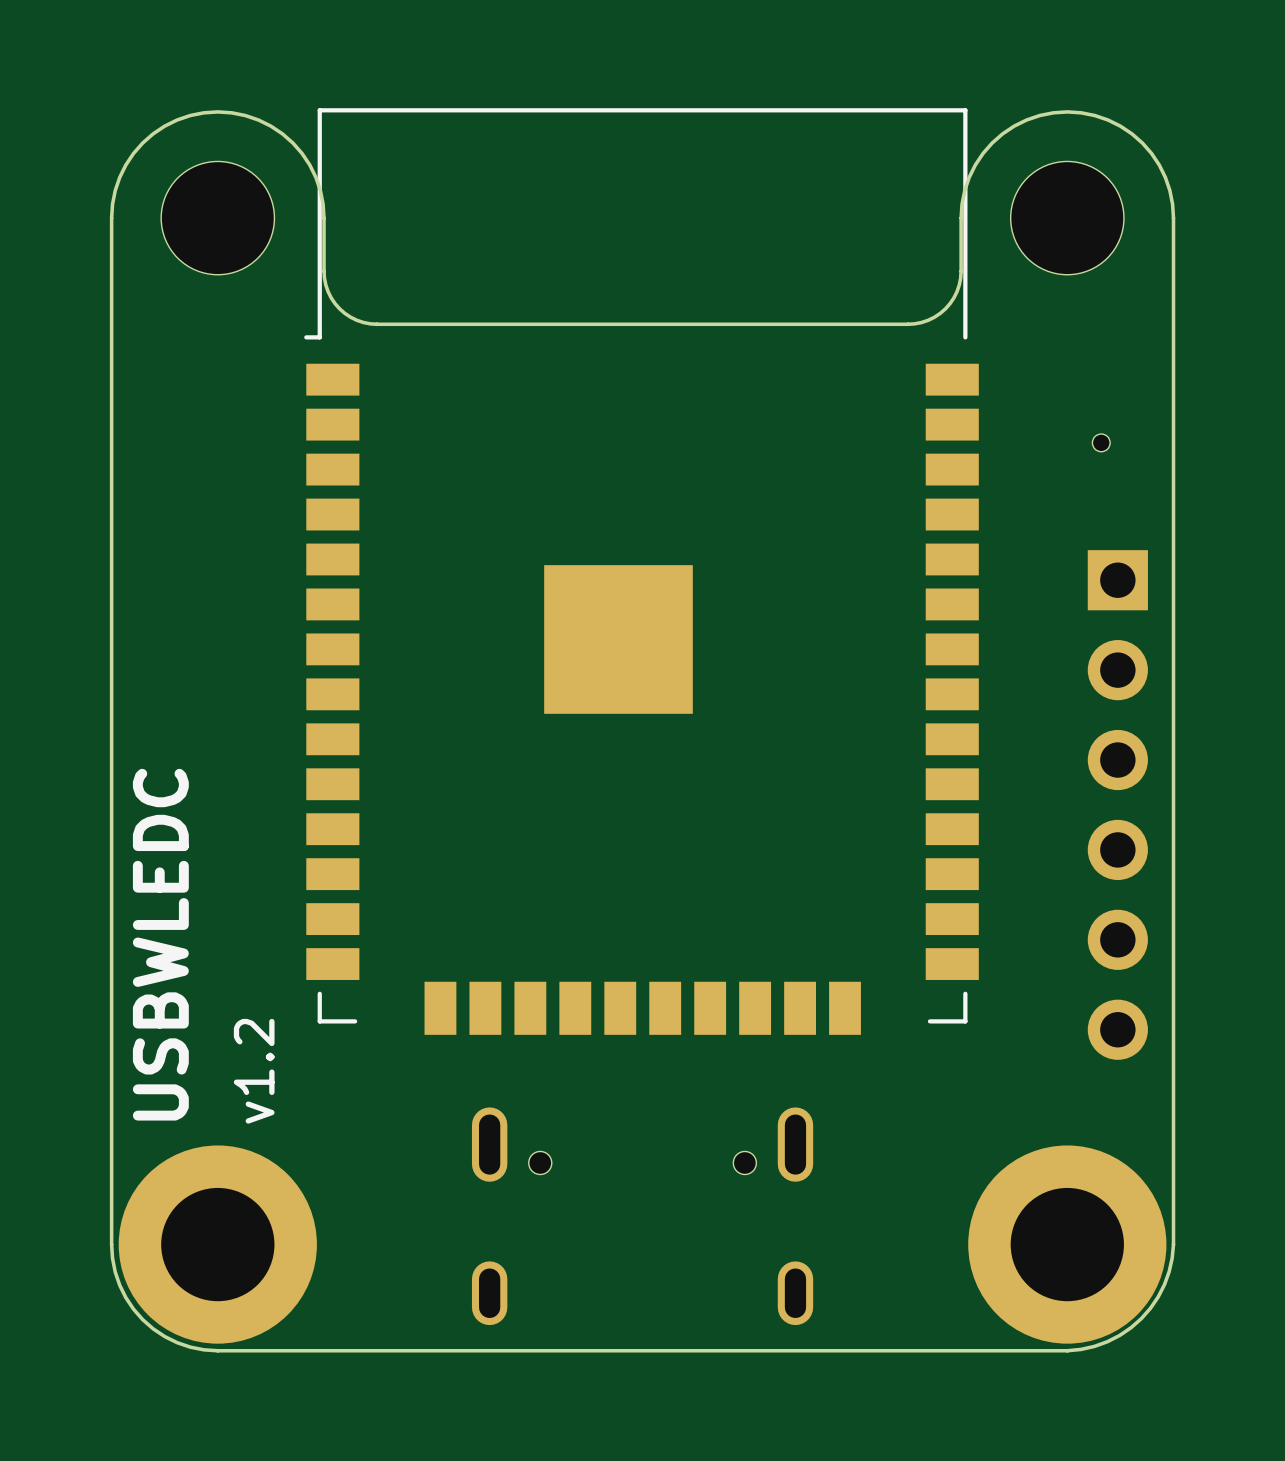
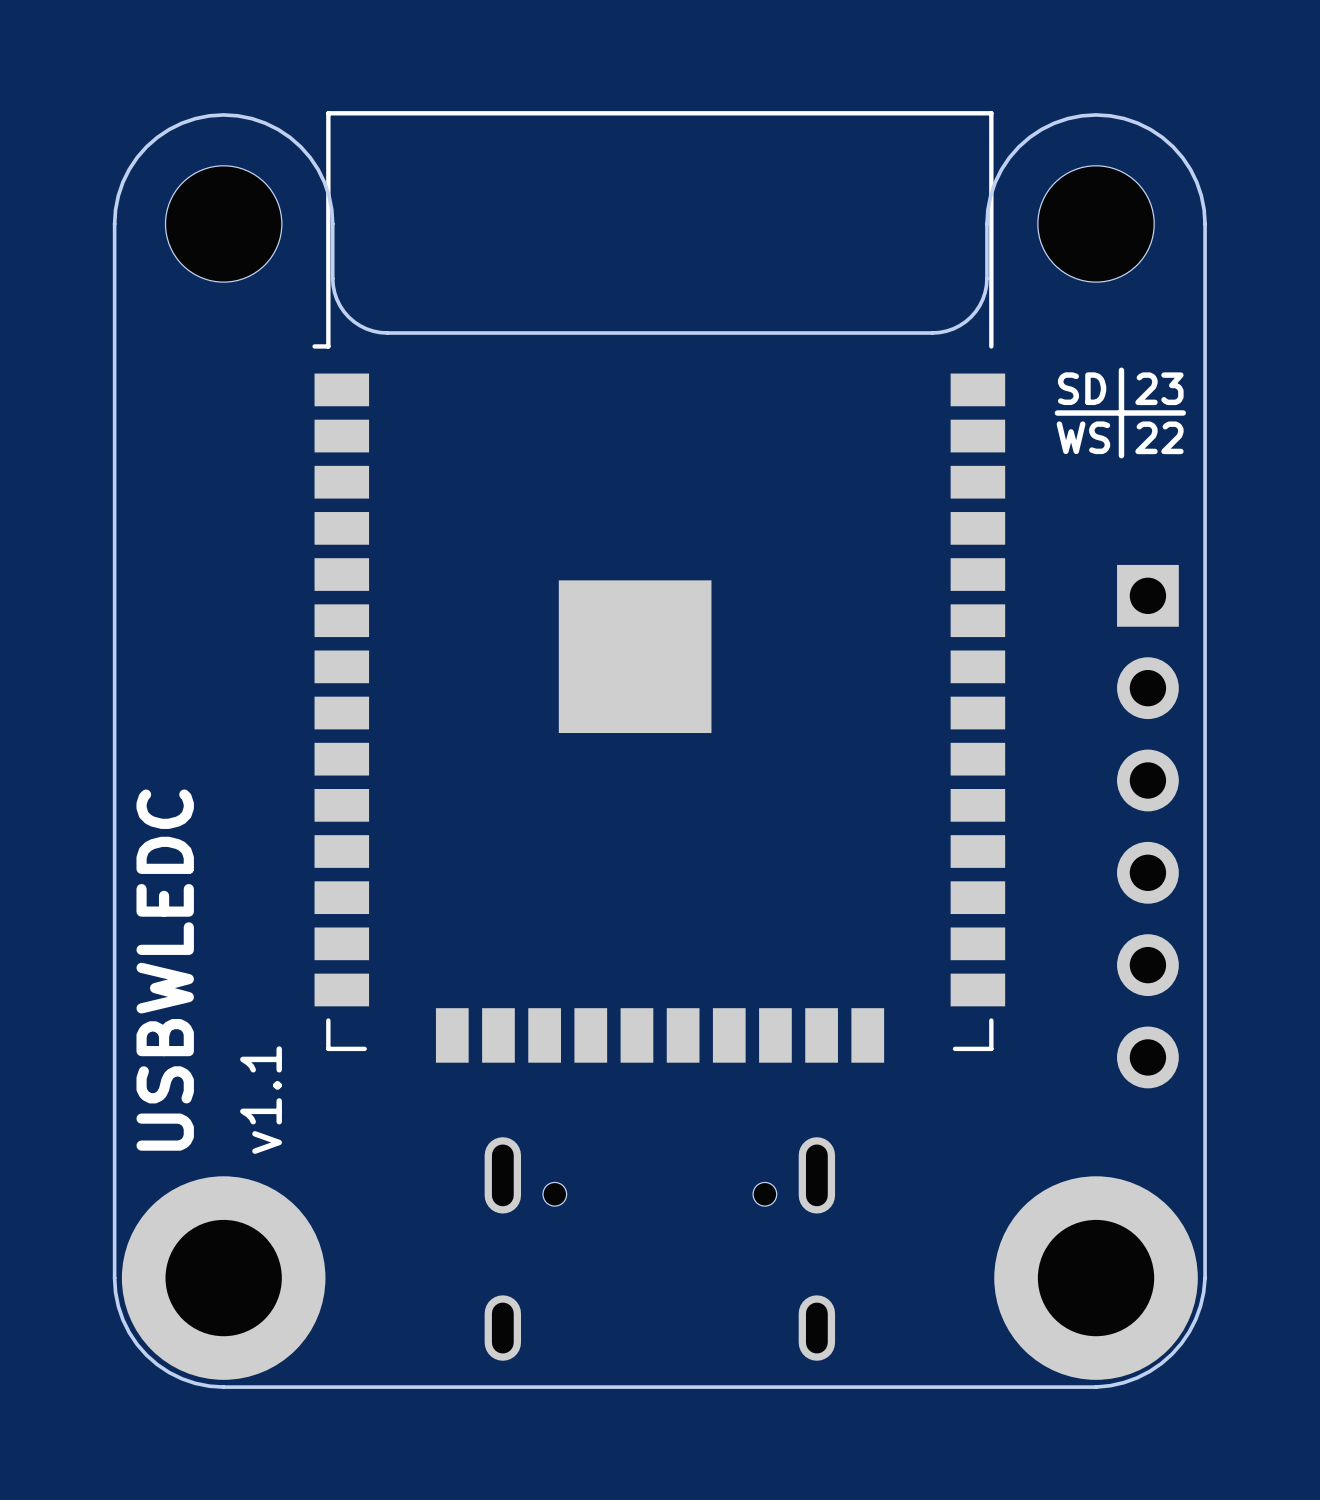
line: none -> (1121, 370) (1121, 455)
text: none -> SD (1082, 388)
text: none -> 23 (1159, 388)
line: none -> (1183, 412) (1057, 413)
text: none -> WS (1083, 437)
text: none -> 22 (1159, 437)
part: (1101, 442) -> none
text: v1.2 (254, 1071) -> v1.1 (261, 1100)

